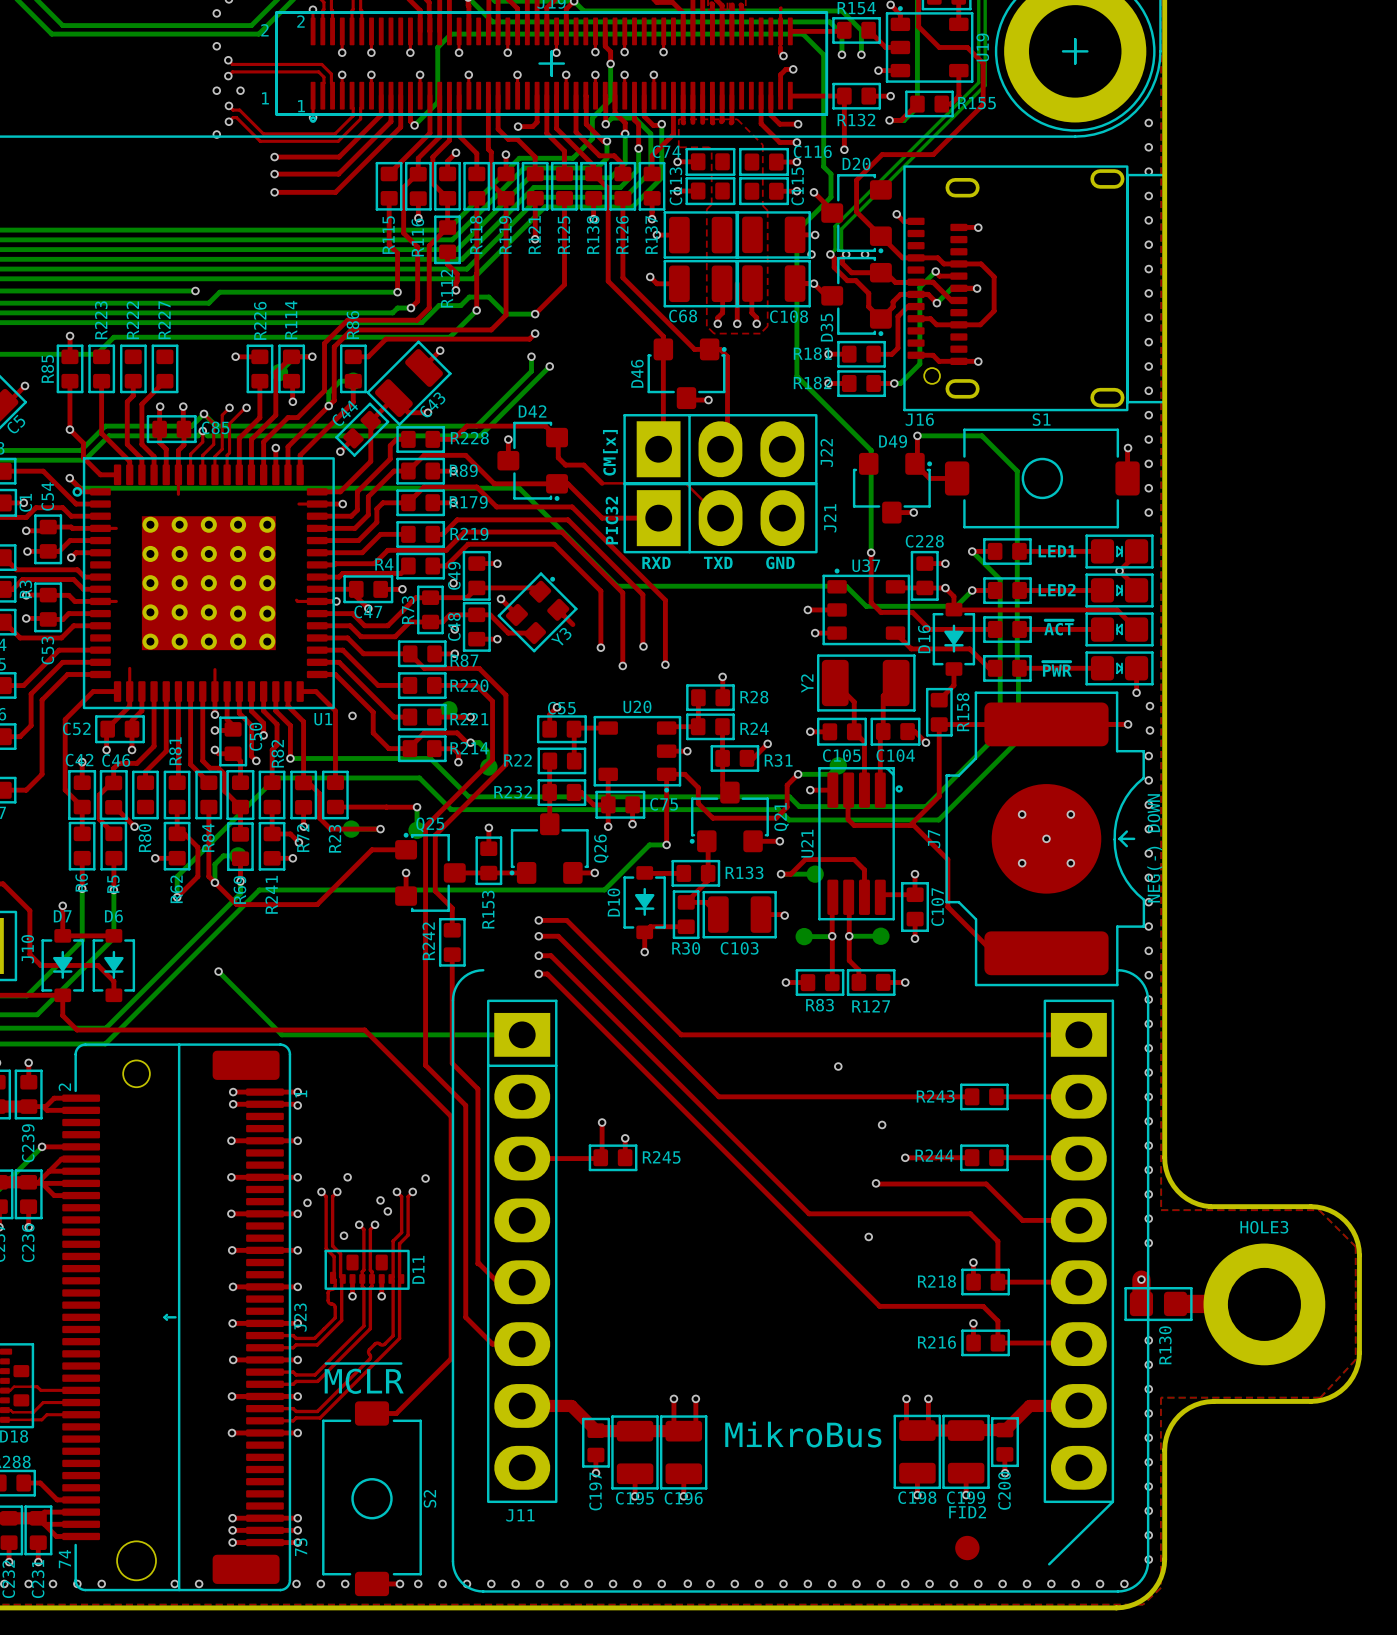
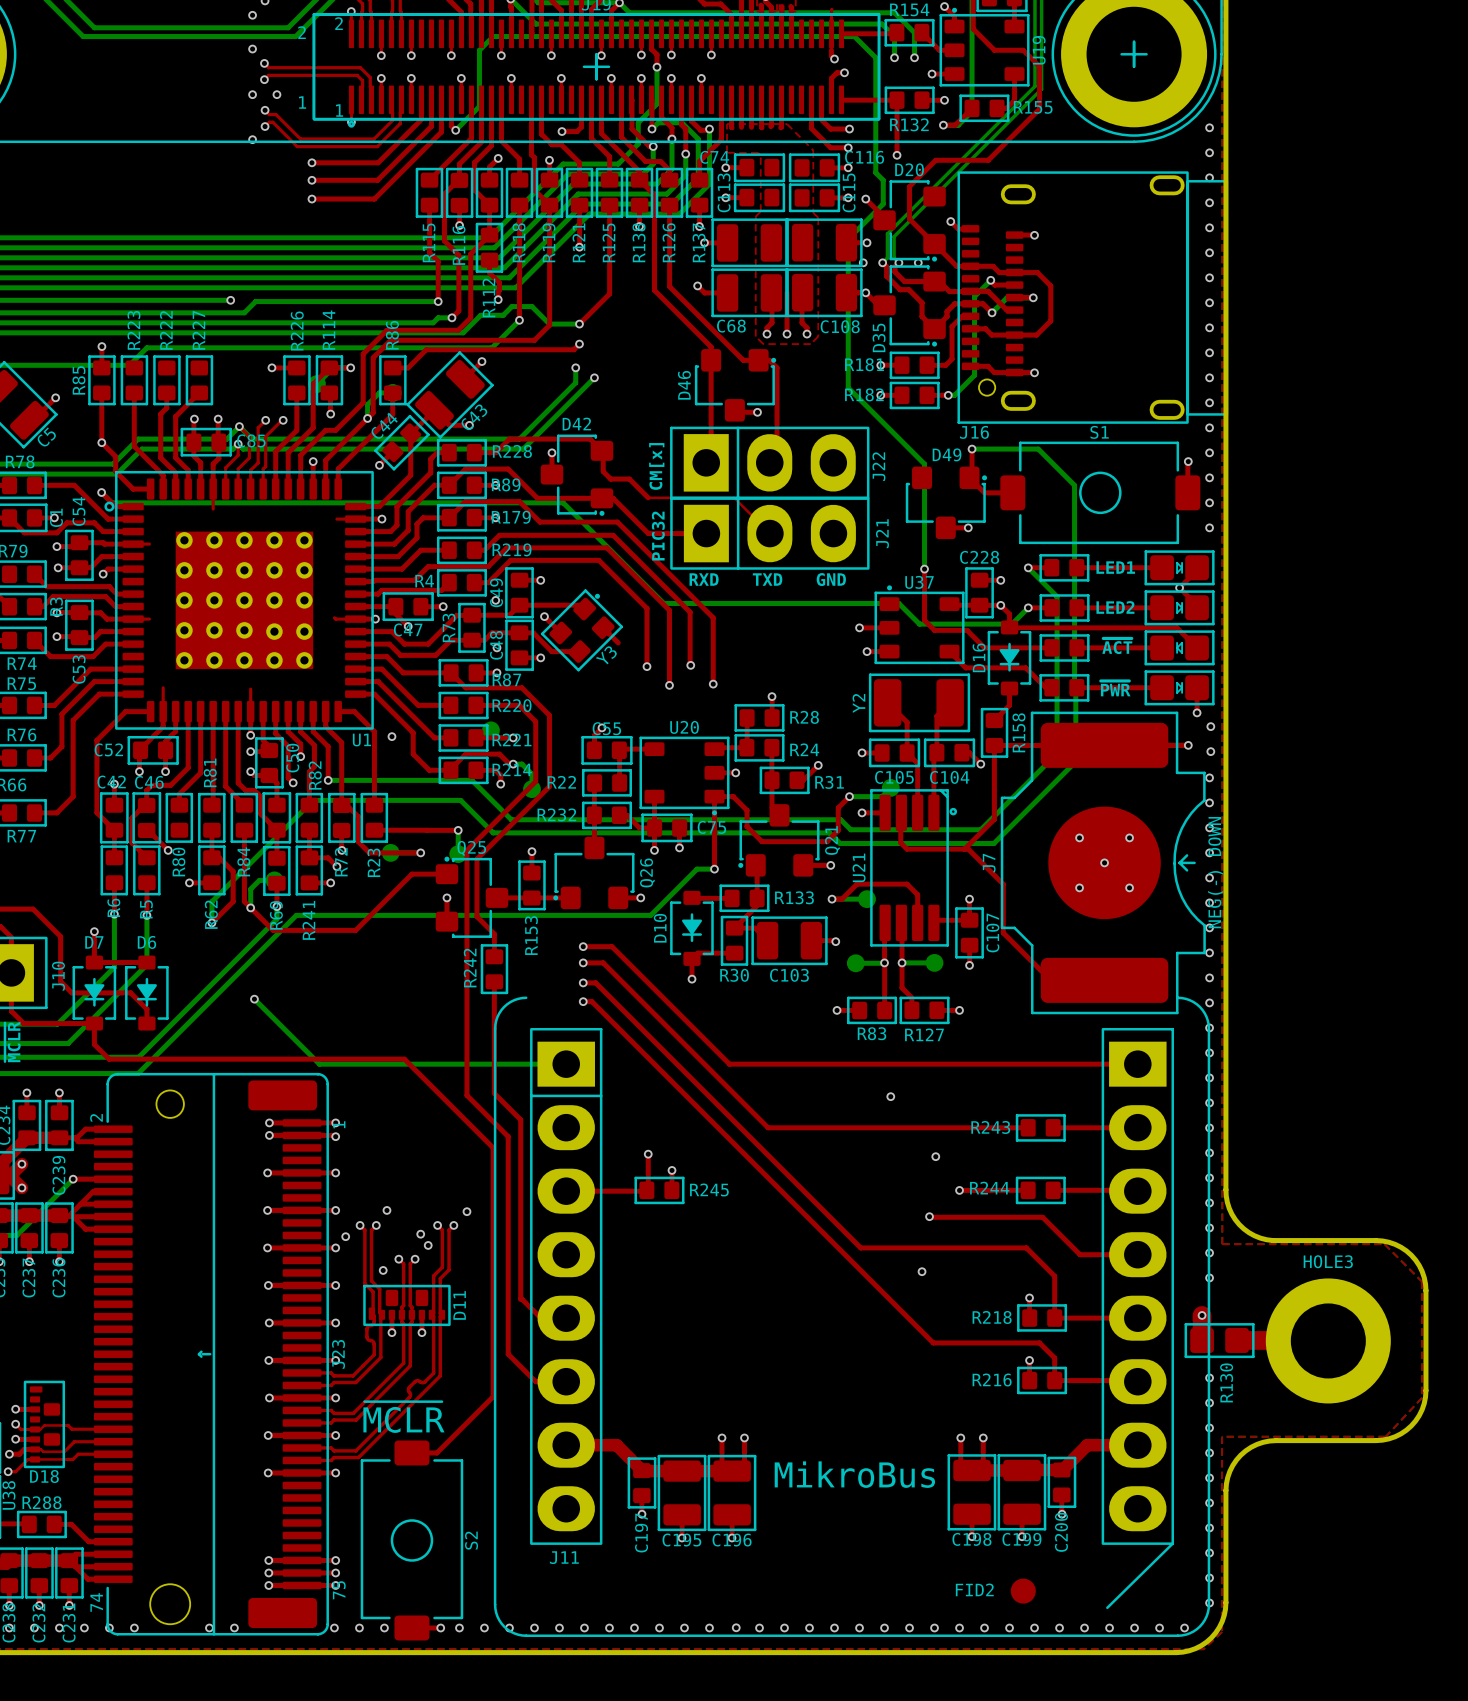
FID2 name position: FID2 (967, 1512) -> FID2 (974, 1589)

